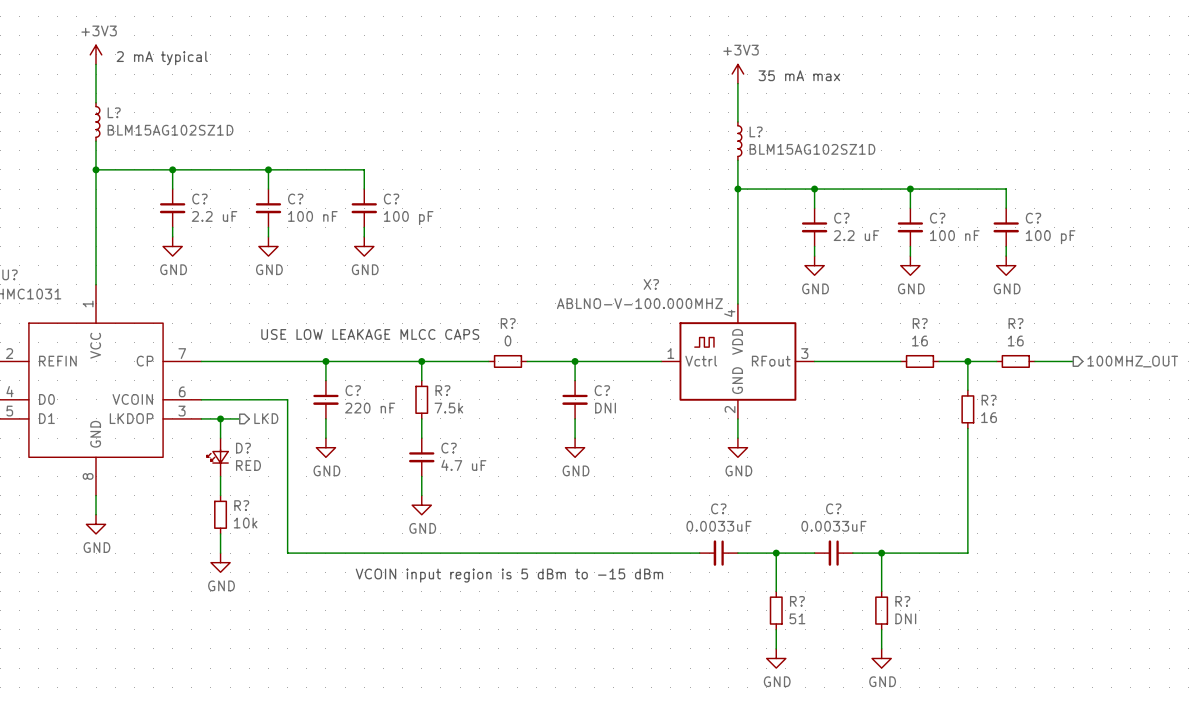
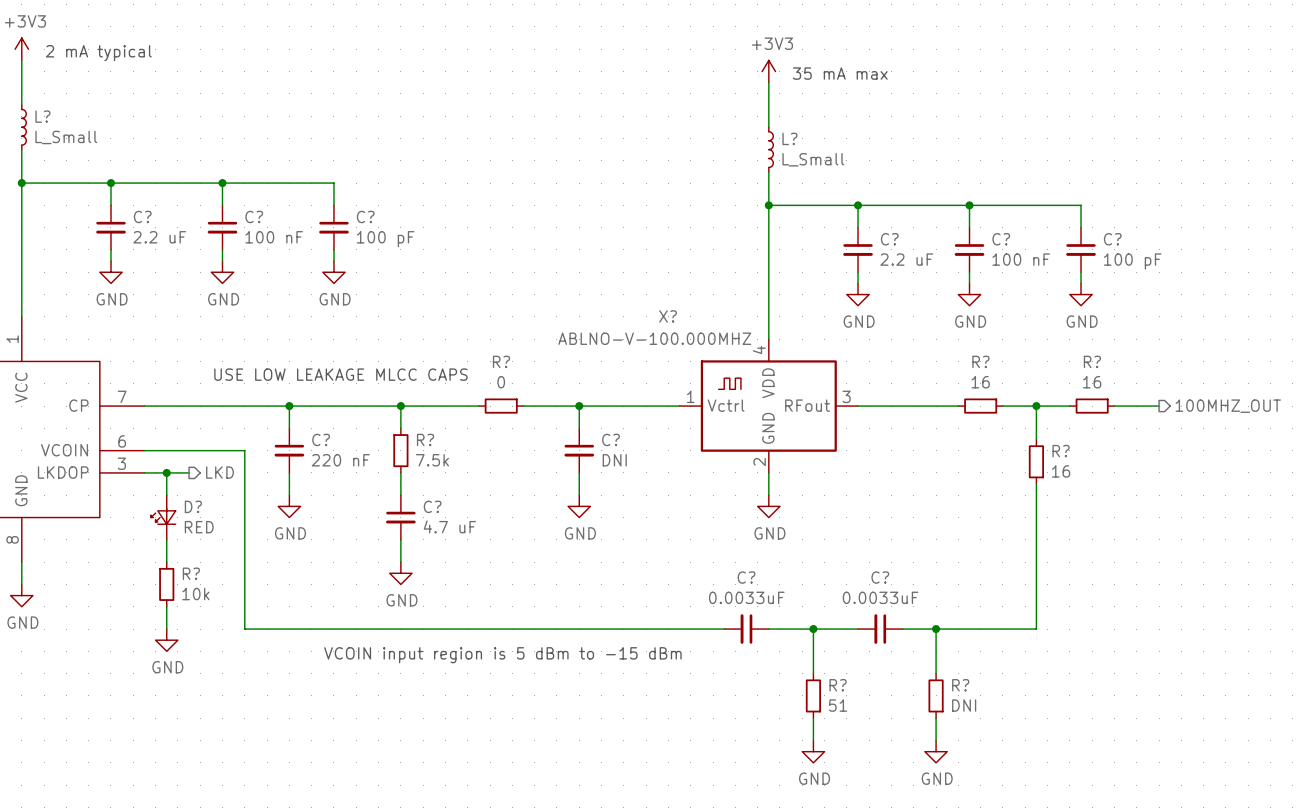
L? value: BLM15AG102SZ1D (170, 130) -> L_Small (66, 137)
L? value: BLM15AG102SZ1D (812, 149) -> L_Small (813, 159)

